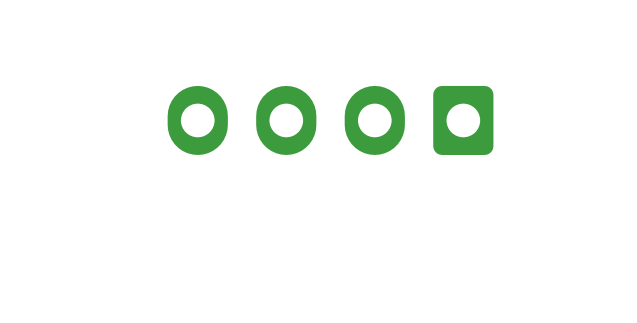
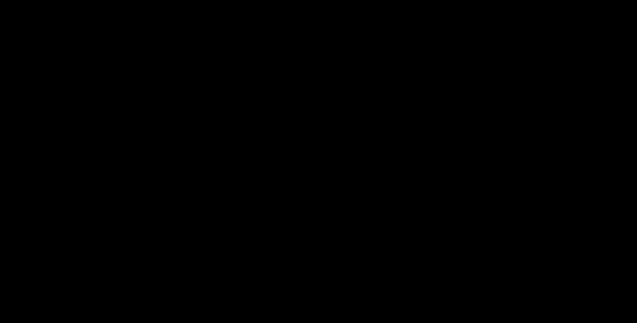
part: (330, 120) -> none

